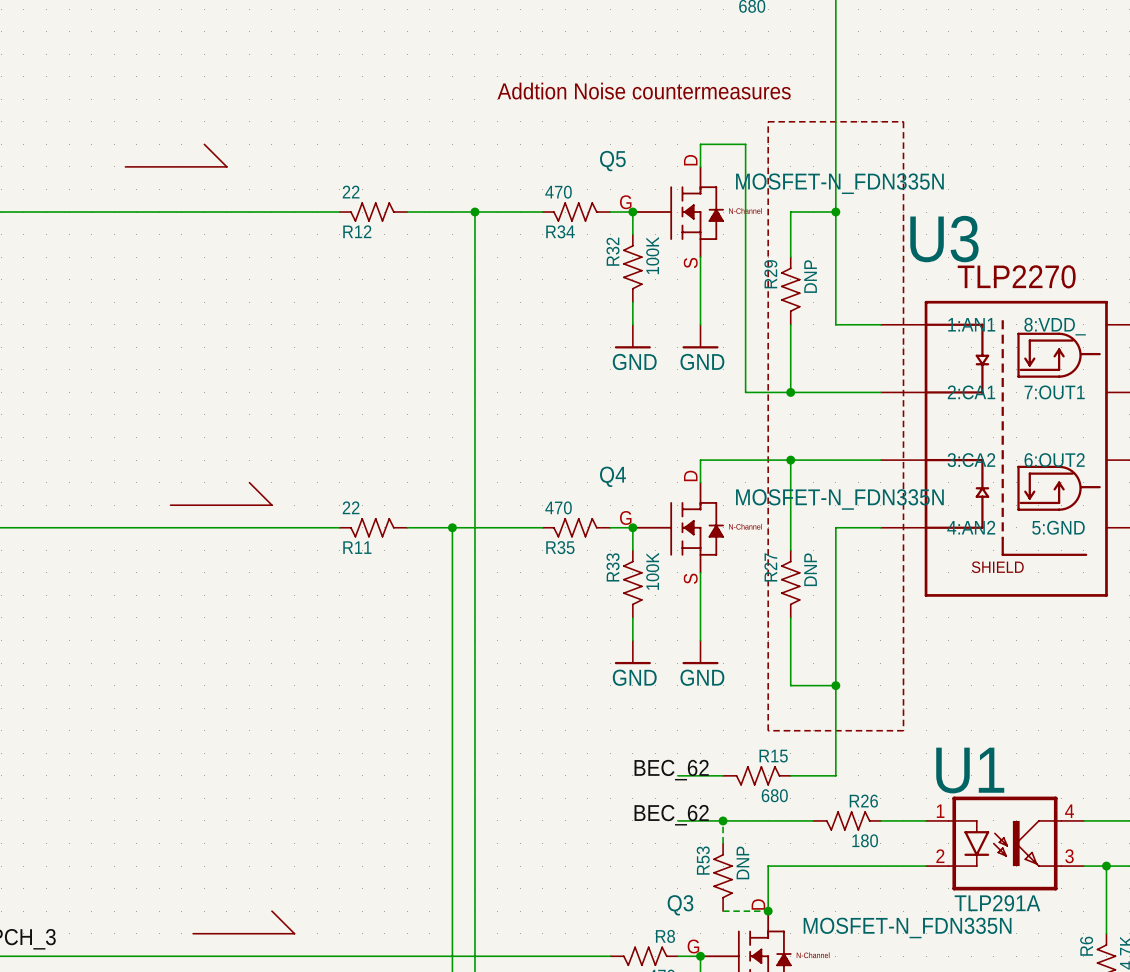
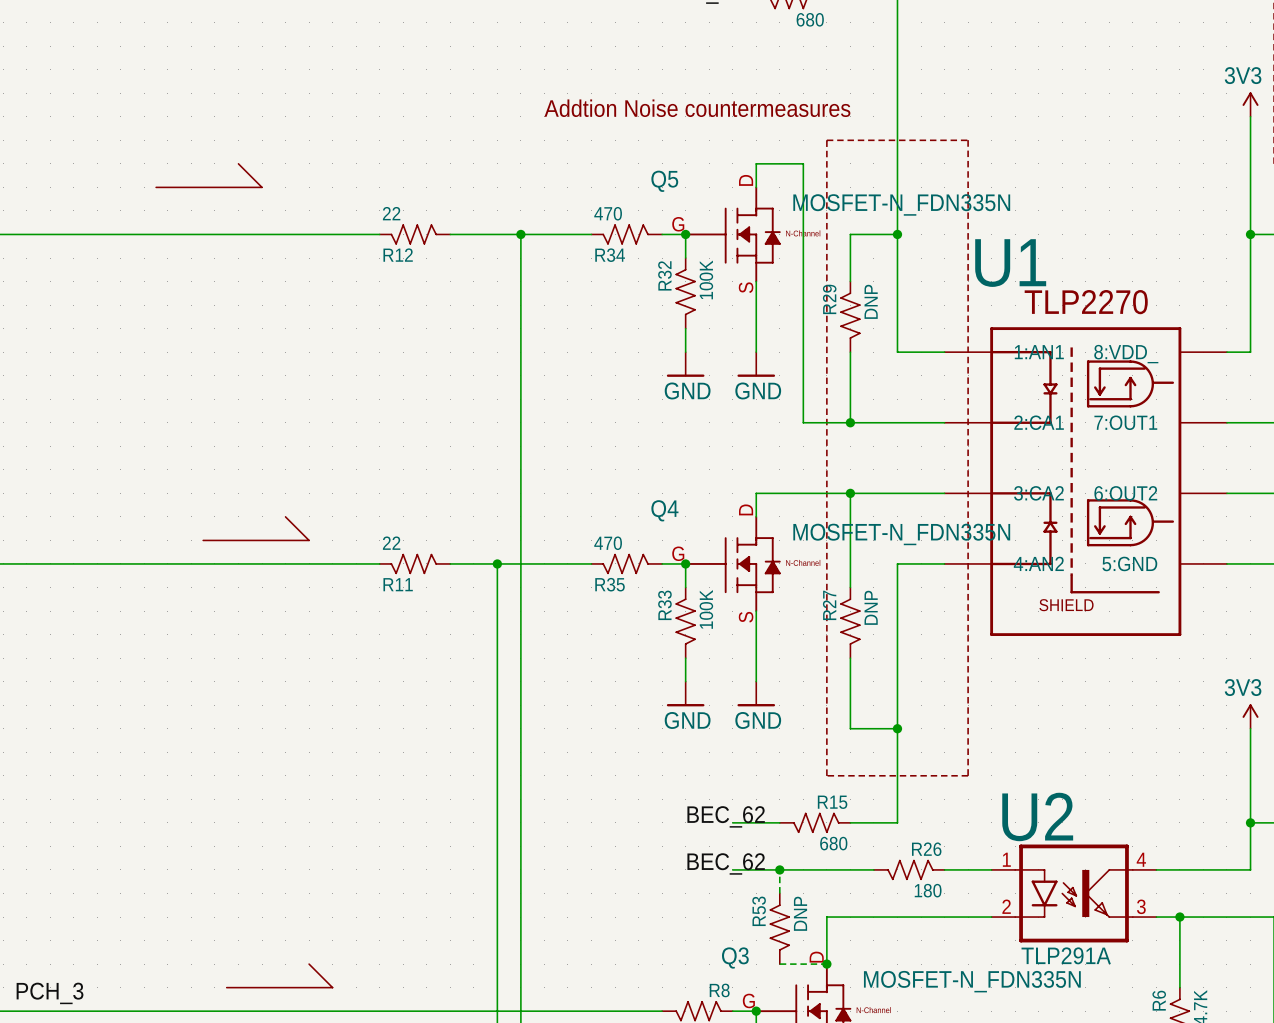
U3 name: U3 (944, 239) -> U1 (1010, 263)
U1 name: U1 (970, 770) -> U2 (1037, 816)

